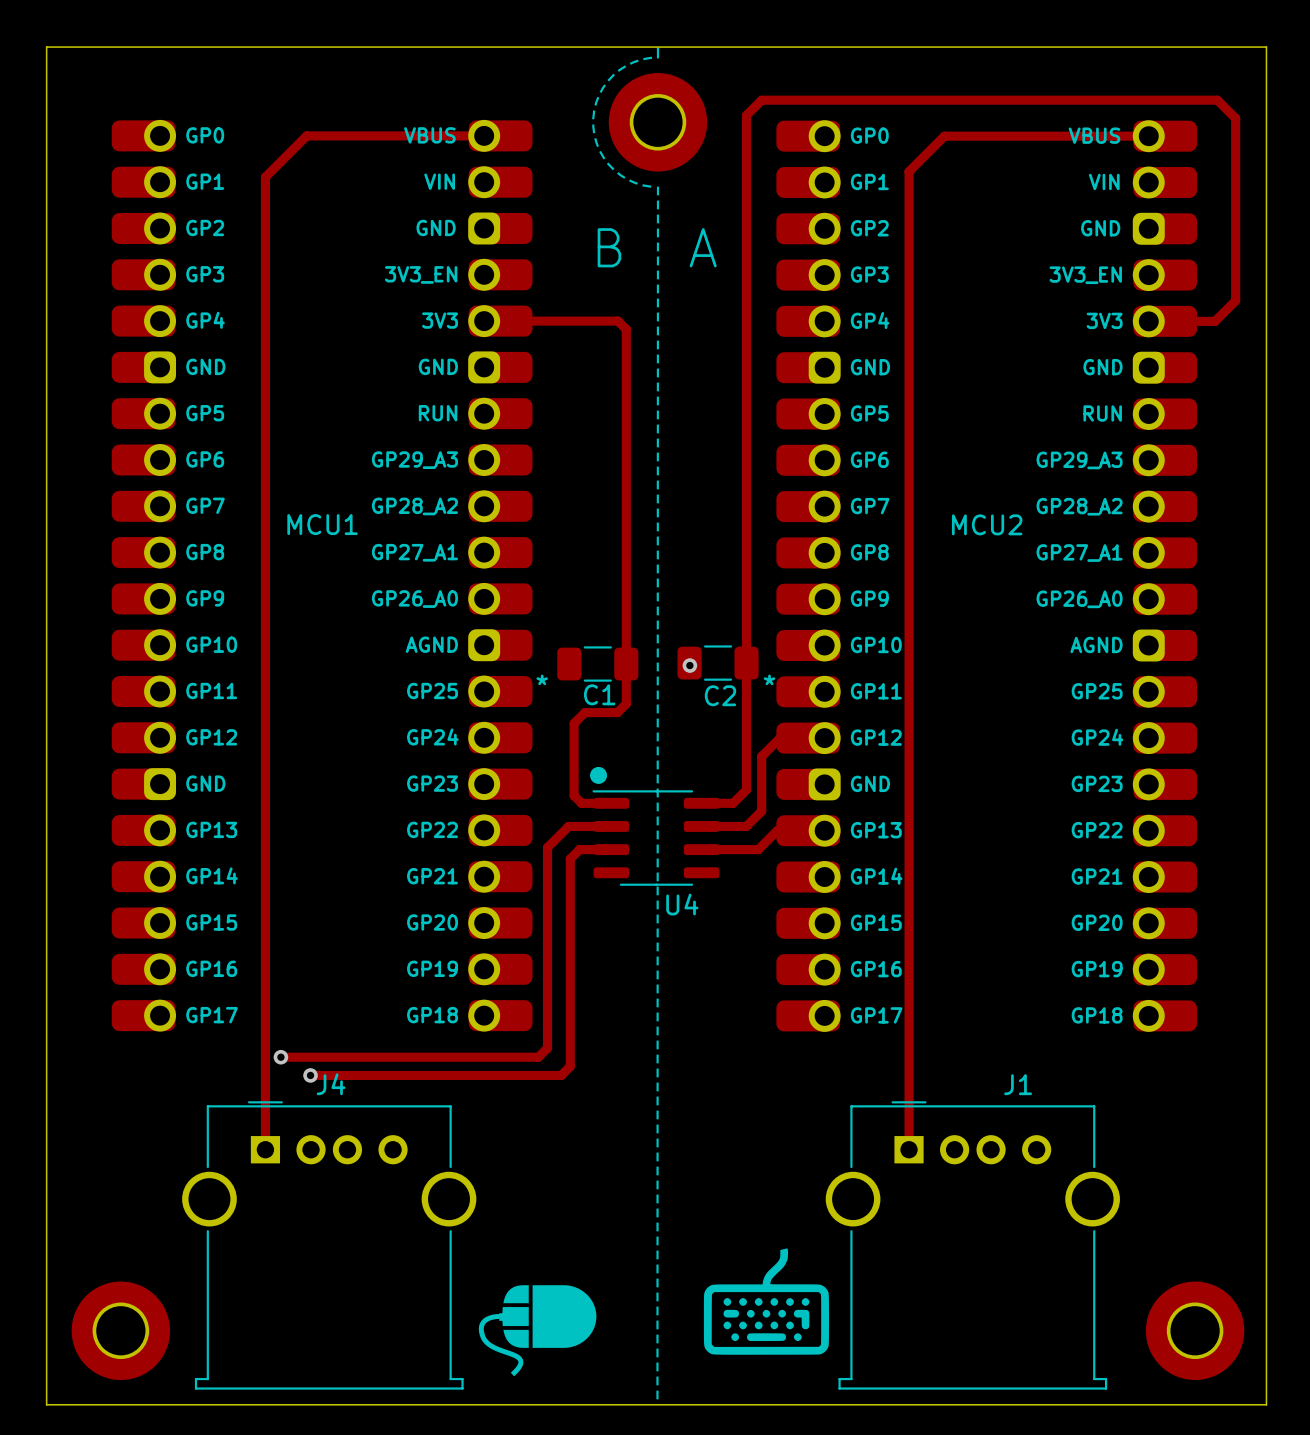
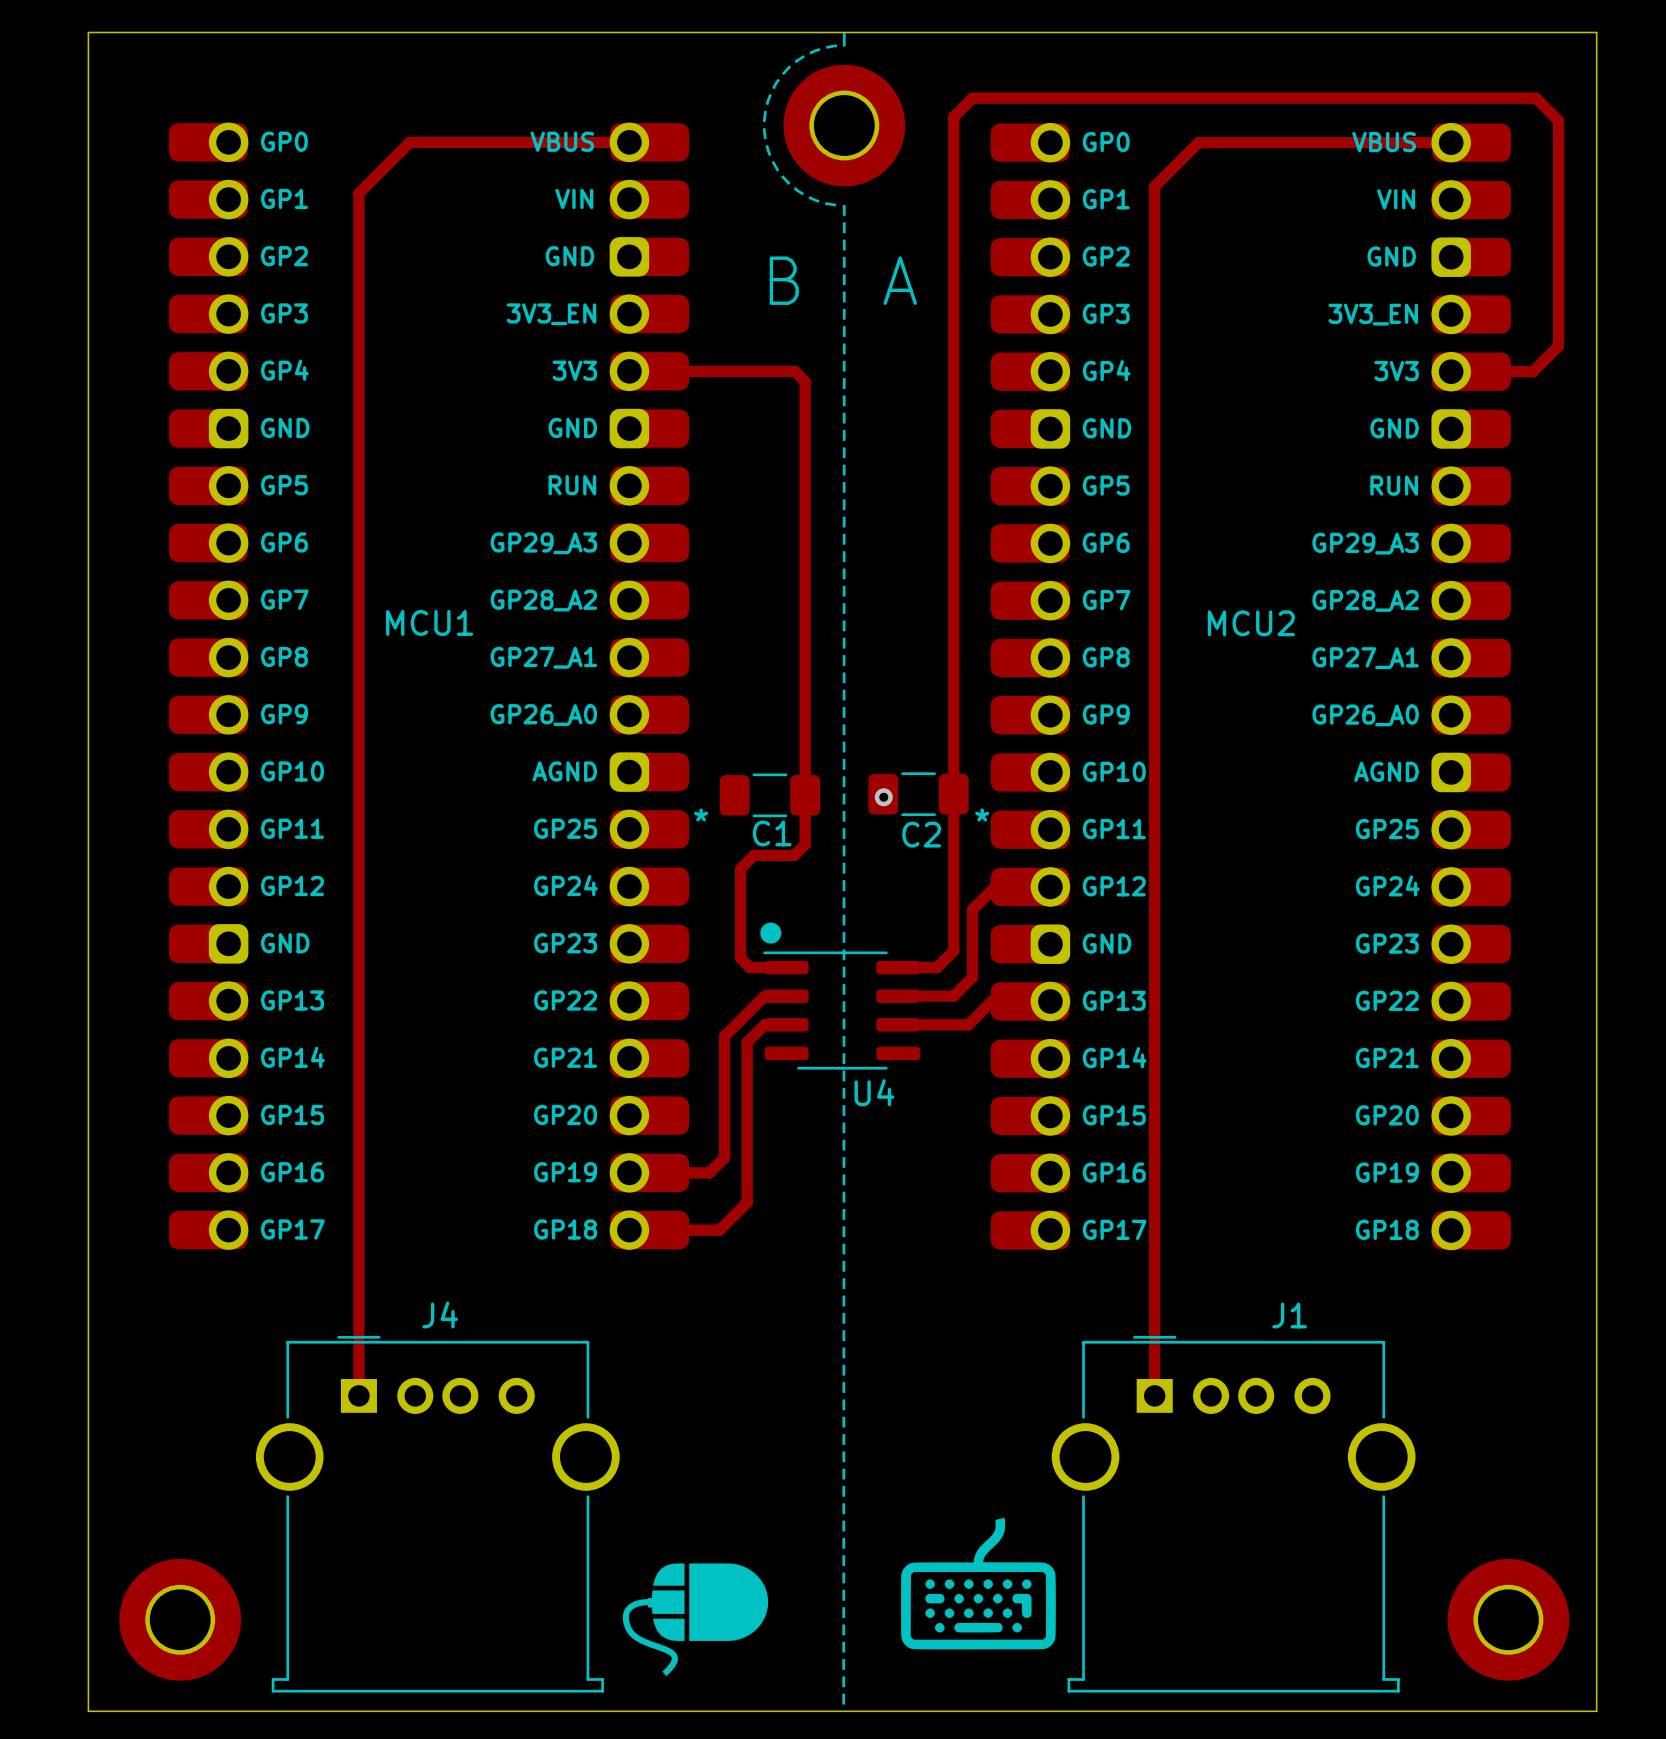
track: (593, 826) (568, 826) (547, 847) (547, 1048) (538, 1057) (280, 1057) -> (764, 996) (724, 1036) (724, 1157) (709, 1172) (629, 1172)
track: (593, 849) (579, 849) (570, 858) (570, 1066) (561, 1075) (310, 1075) -> (764, 1024) (747, 1042) (747, 1202) (719, 1230) (629, 1230)
via: (280, 1057) -> none
via: (310, 1075) -> none

